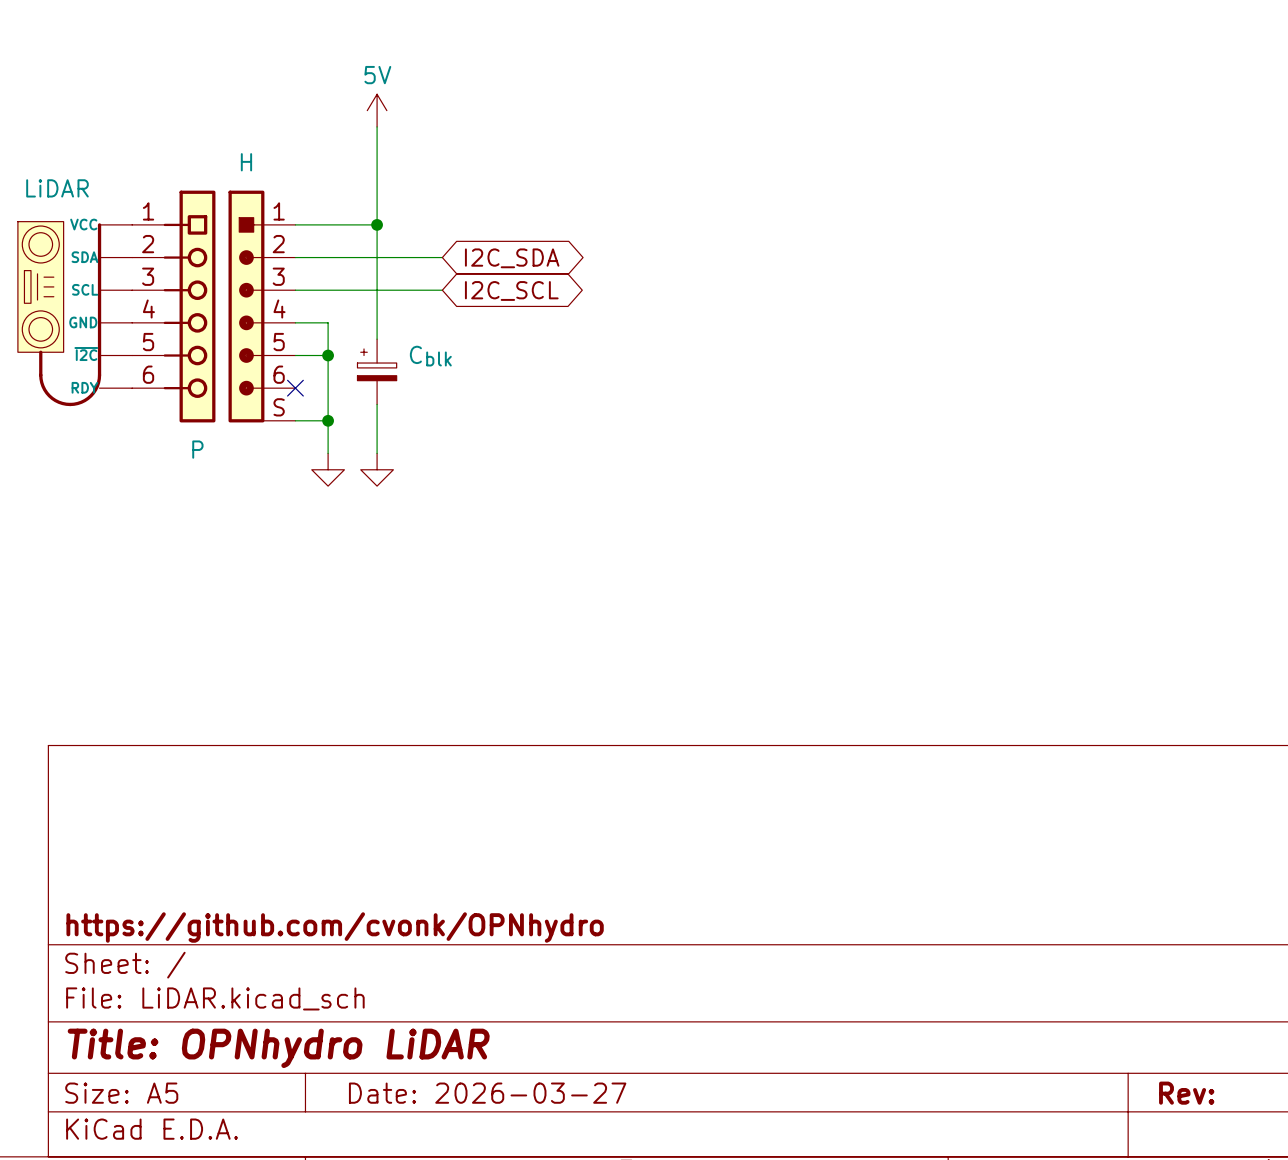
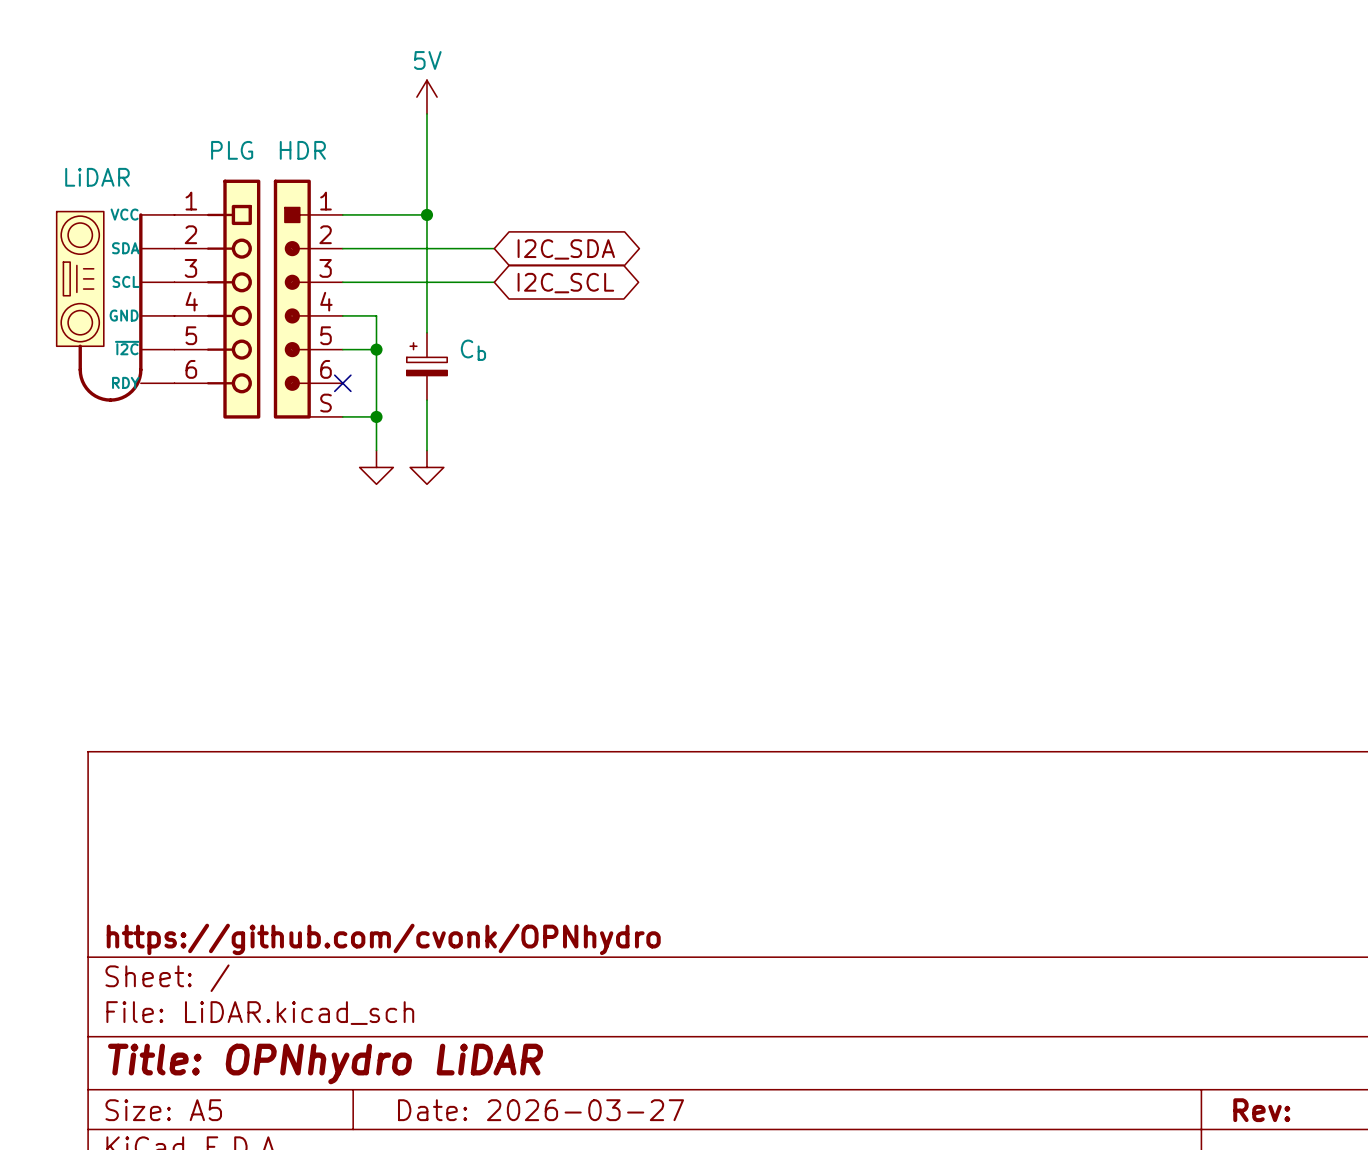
H name: H (246, 162) -> HDR (302, 150)
Cblk name: Cblk (430, 356) -> Cb (473, 350)
P name: P (197, 449) -> PLG (232, 150)

